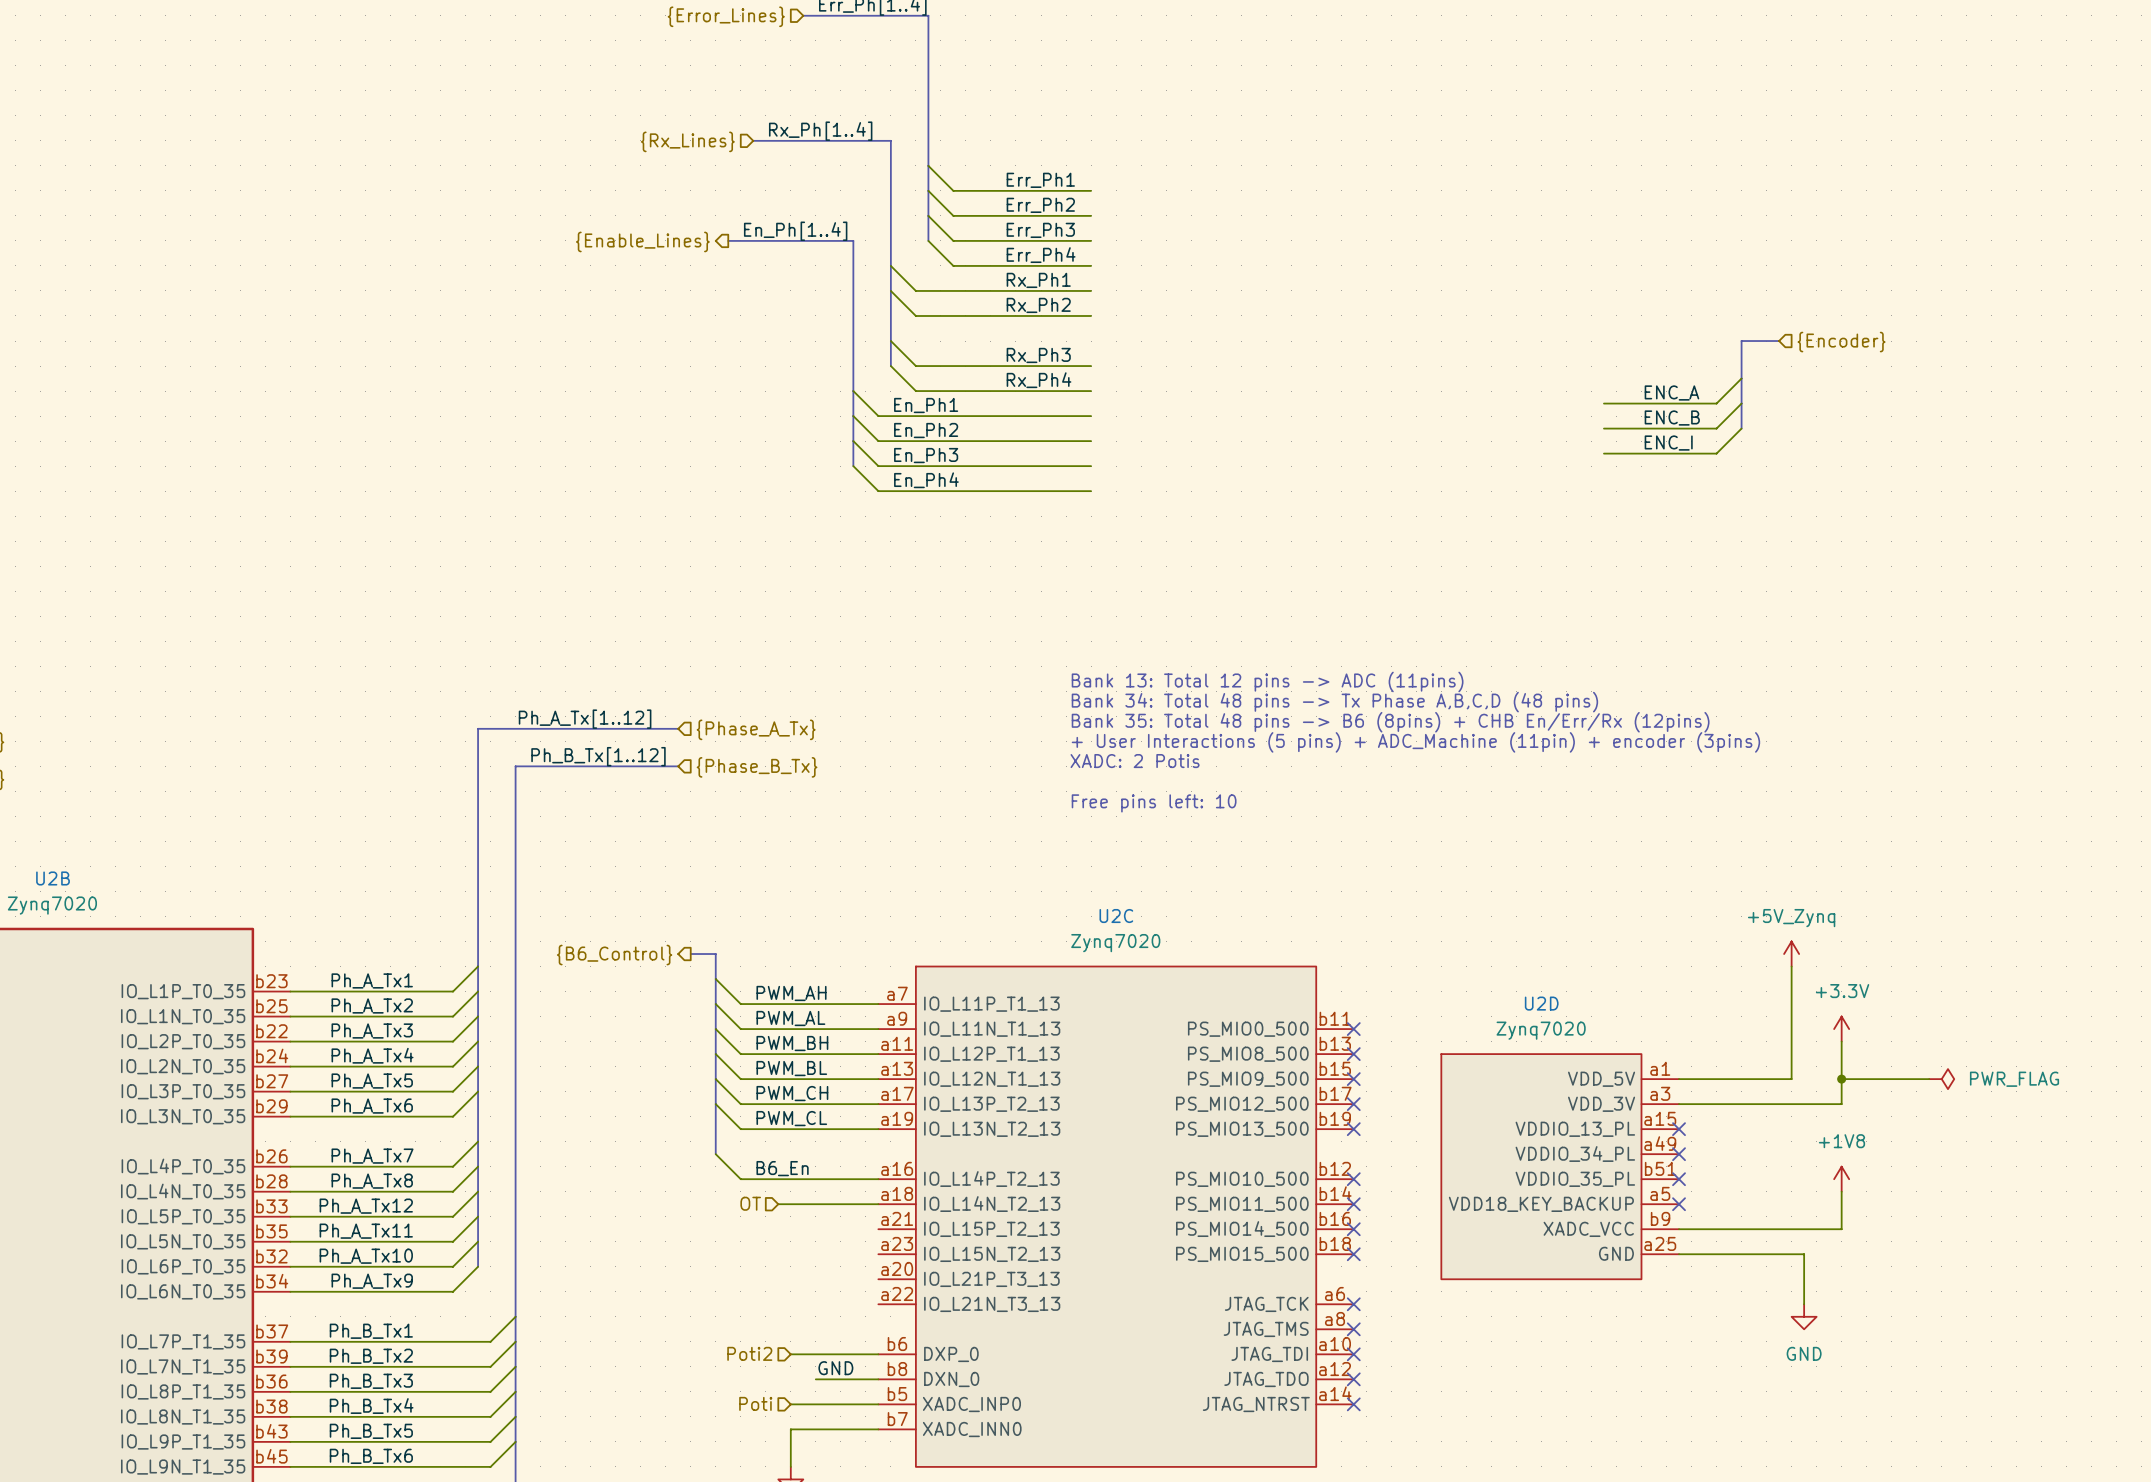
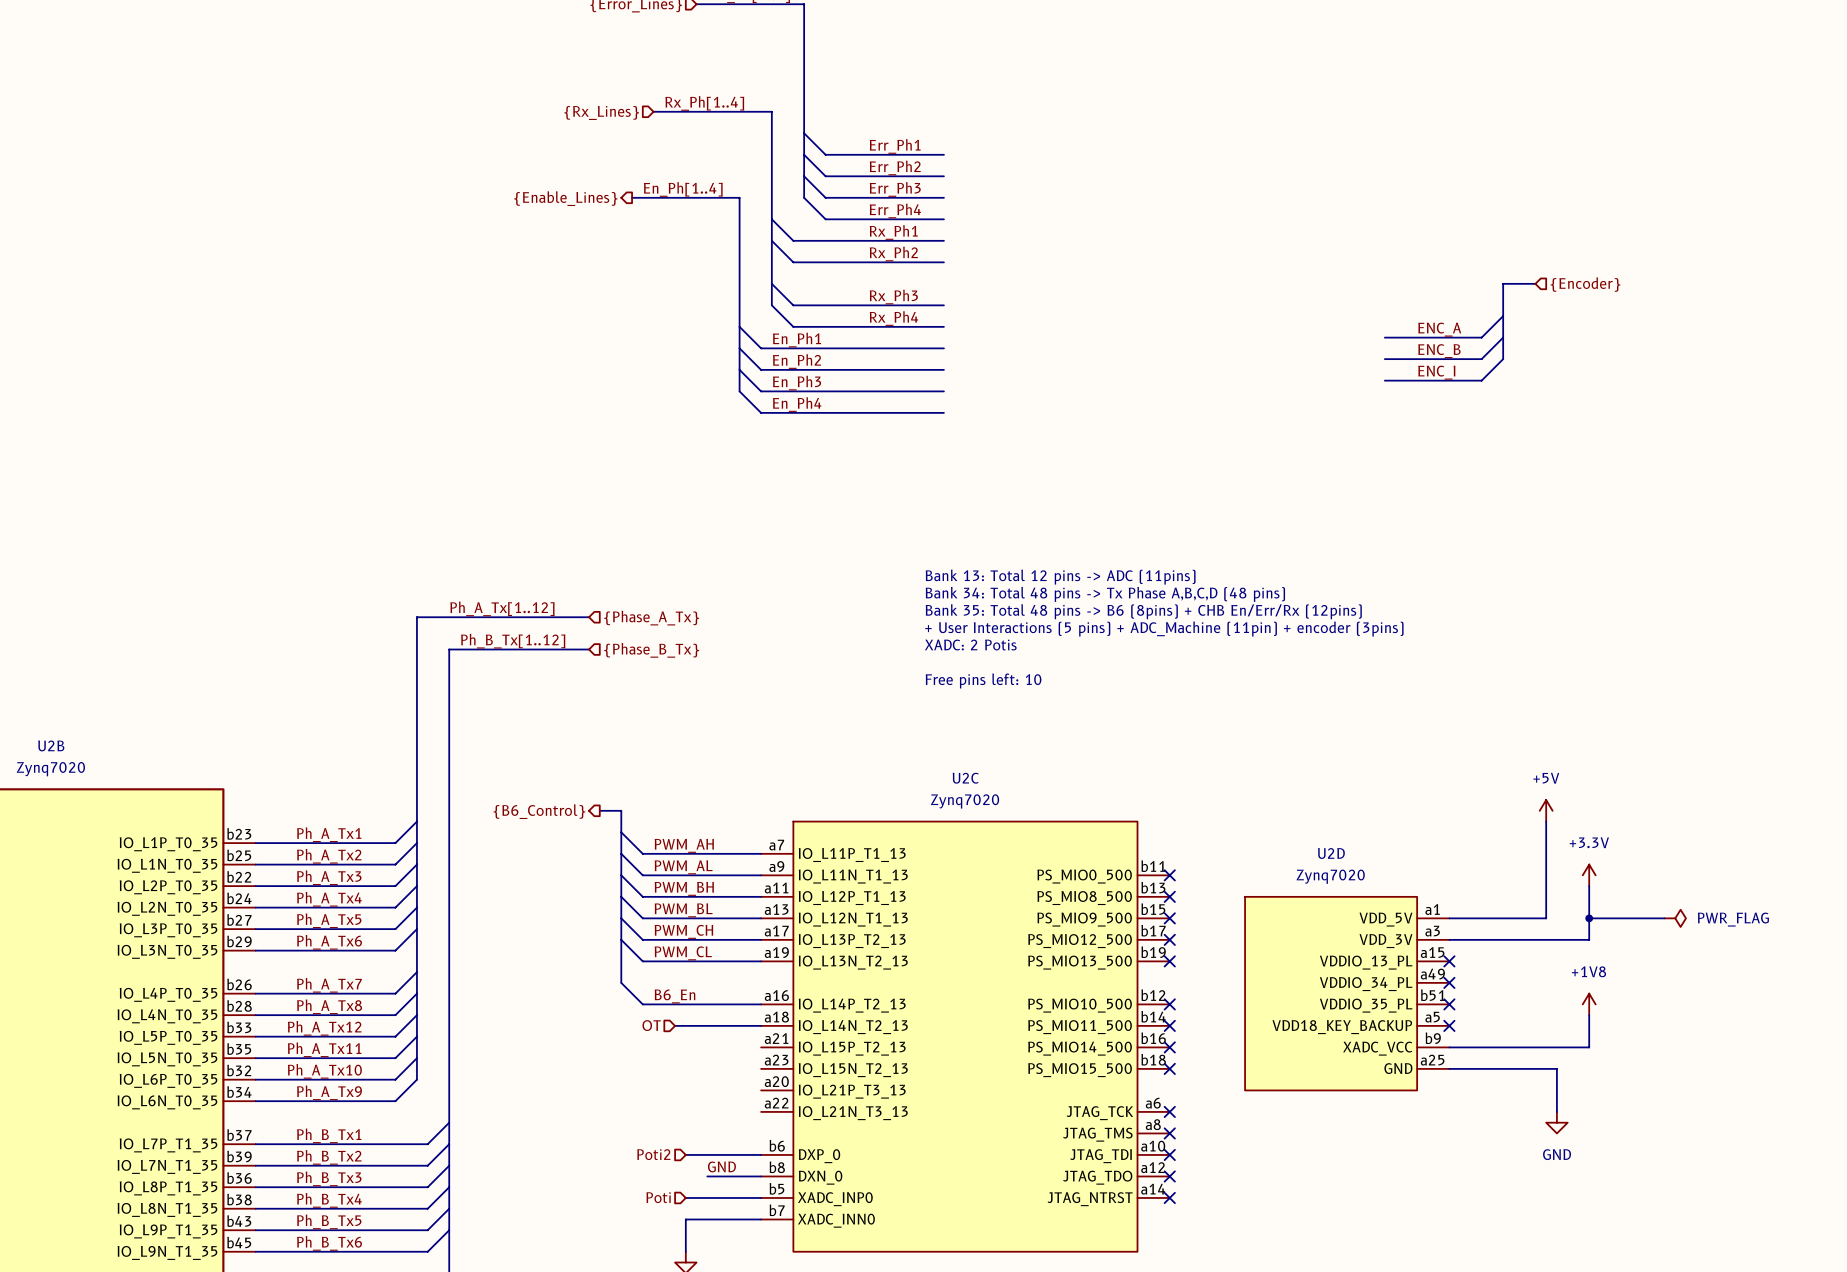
power symbol: +5V_Zynq (1791, 954) -> +5V (1546, 810)

